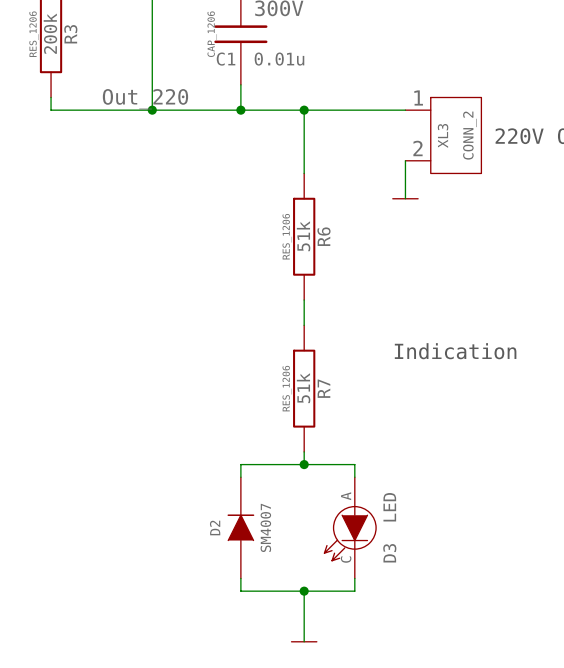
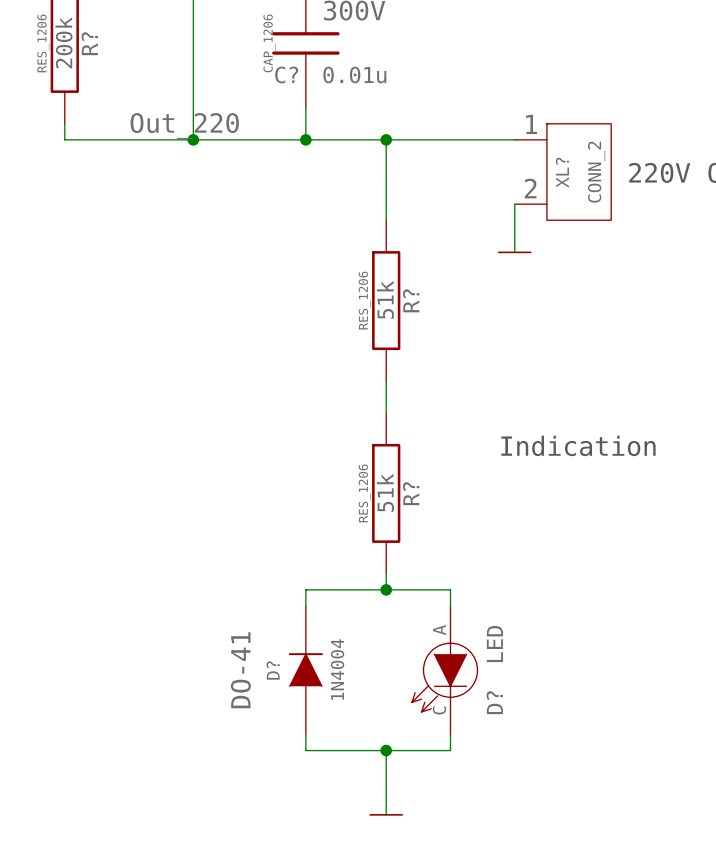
R3 name: R3 (70, 34) -> R? (89, 43)
C1 name: C1 (226, 59) -> C? (286, 74)
XL3 name: XL3 (443, 135) -> XL? (562, 172)
R6 name: R6 (323, 236) -> R? (411, 300)
R7 name: R7 (323, 388) -> R? (411, 493)
D2 text: none -> DO-41 (240, 670)
D2 value: SM4007 (265, 527) -> 1N4004 (337, 669)
D2 name: D2 (215, 528) -> D? (273, 670)
D3 name: D3 (389, 553) -> D? (494, 702)

